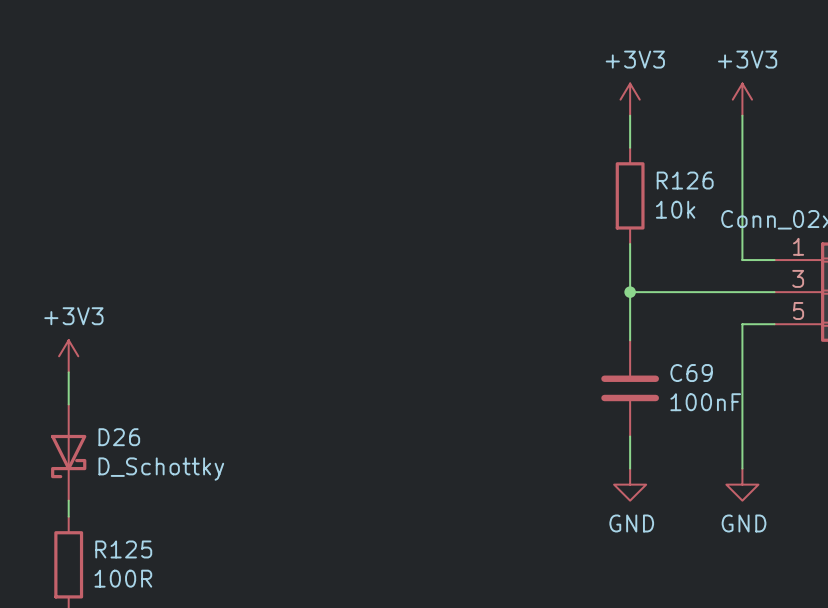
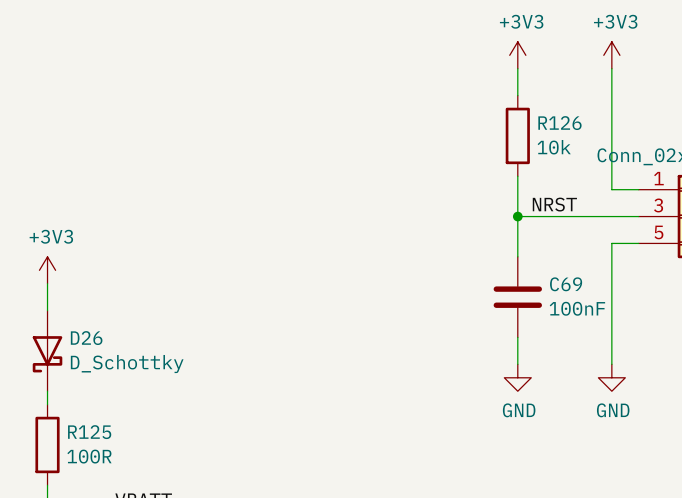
label: none -> NRST (554, 204)

